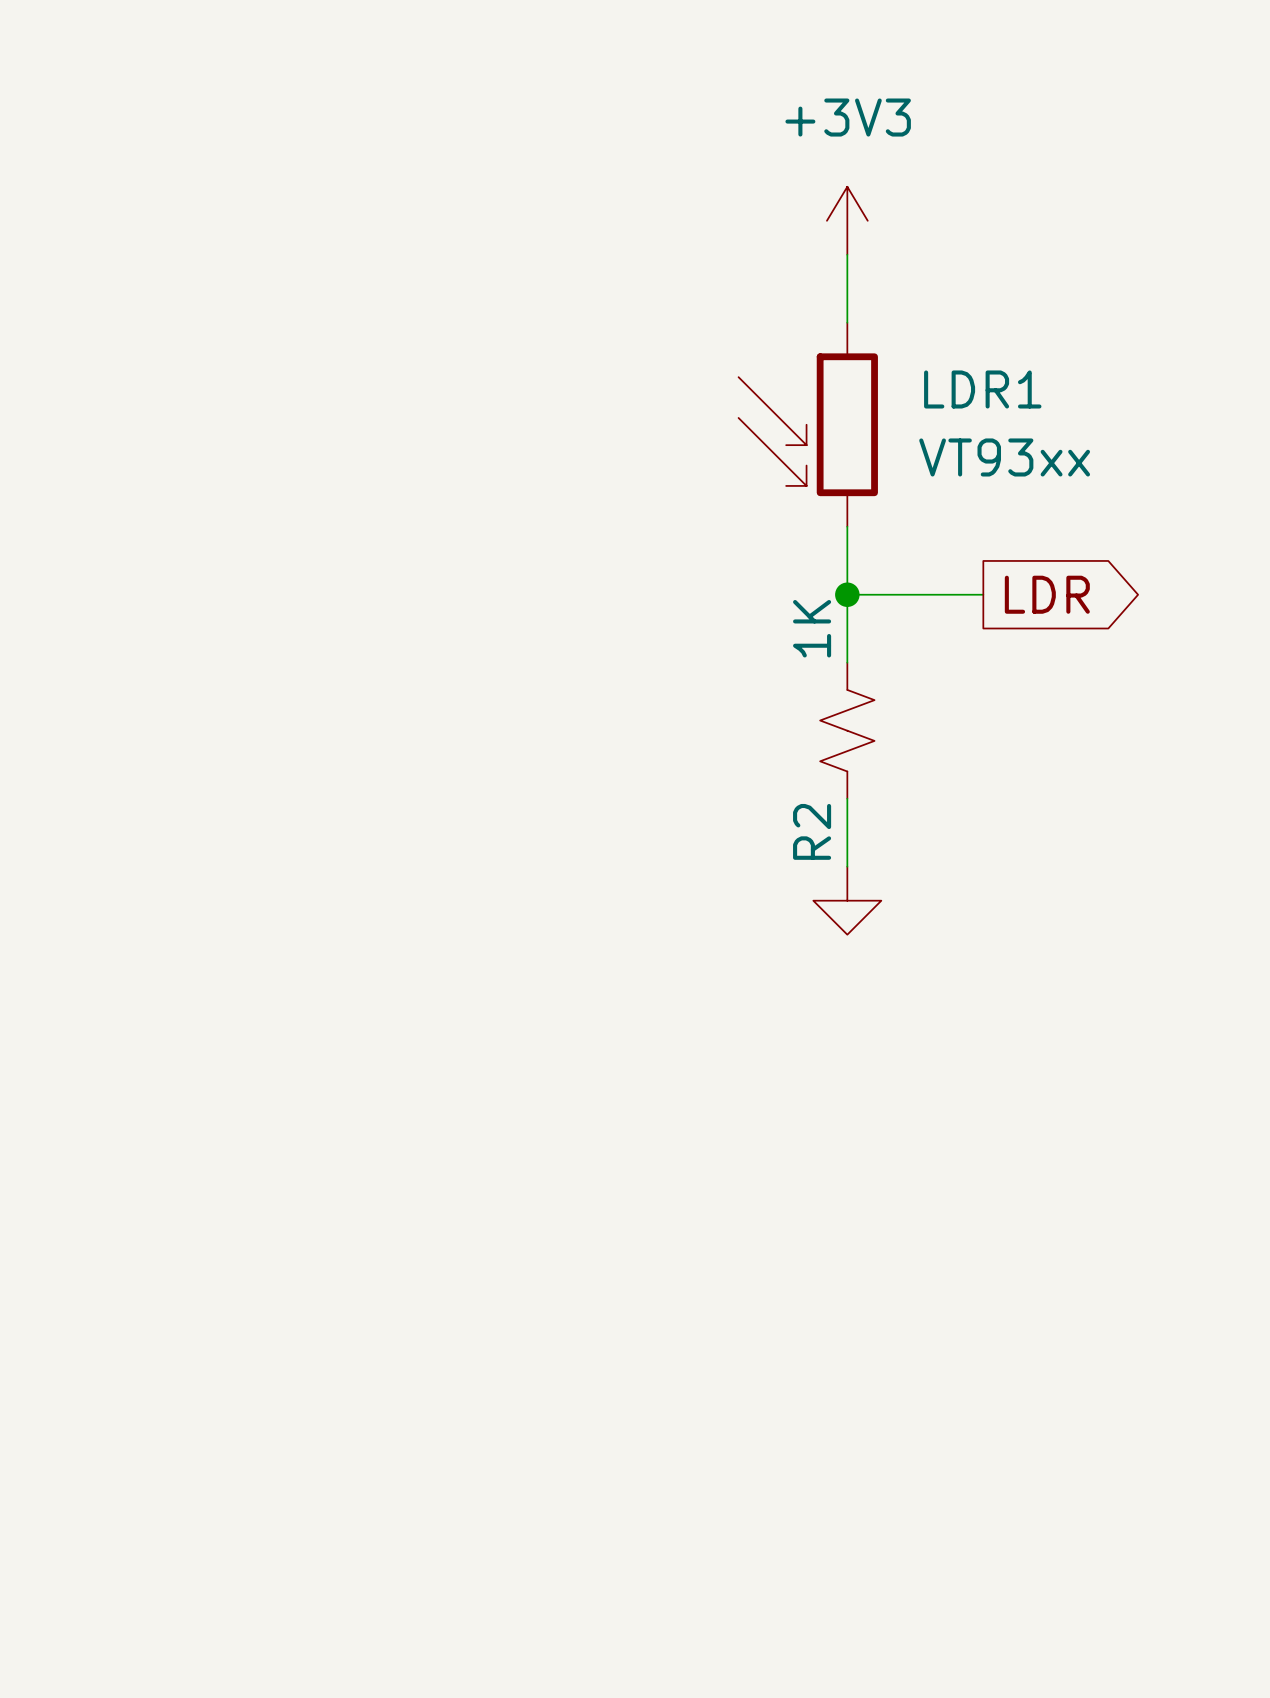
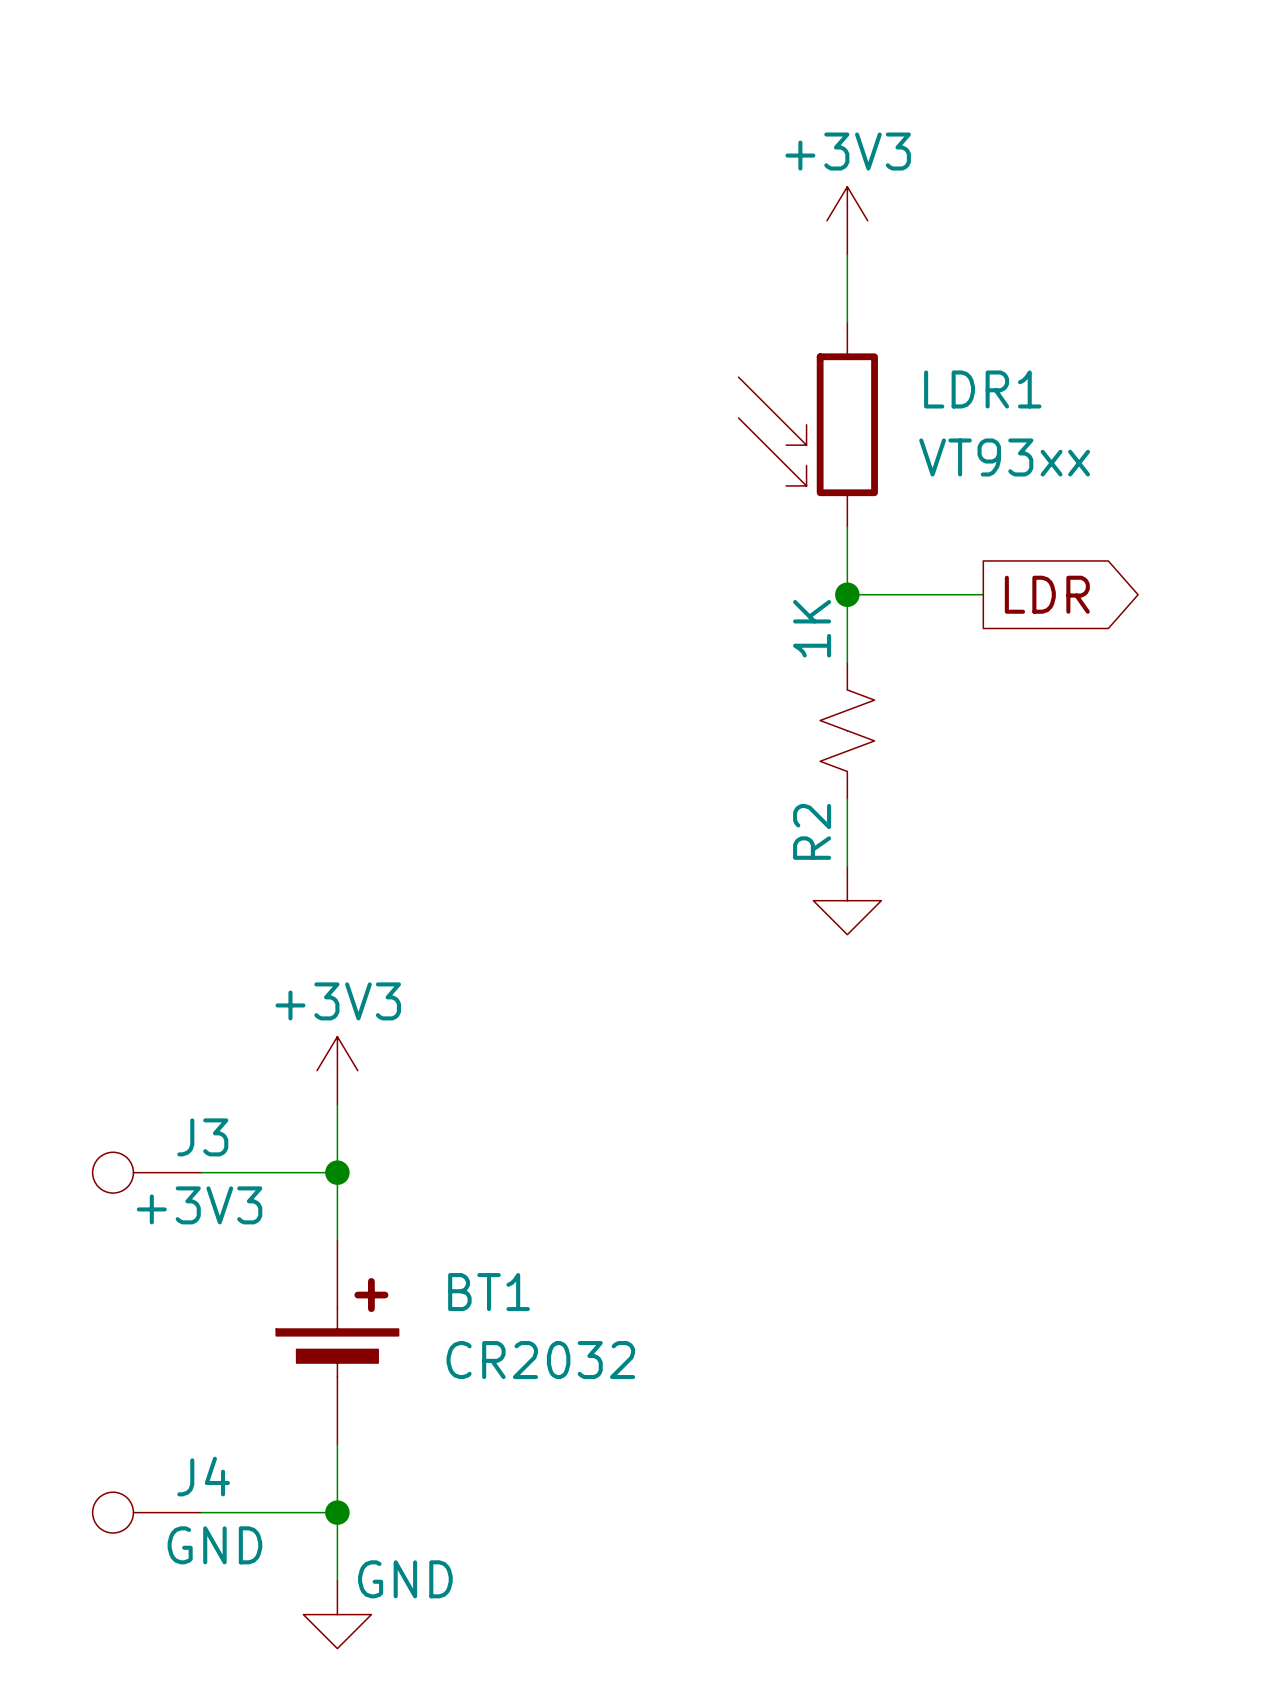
power symbol text position: +3V3 (848, 117) -> +3V3 (848, 151)
power symbol: none -> +3V3 (337, 1070)
wire: none -> (337, 1104) (337, 1240)
J3: none -> +3V3 (147, 1172)
wire: none -> (201, 1172) (337, 1172)
junction: none -> (337, 1172)
BT1: none -> CR2032 (337, 1342)
wire: none -> (337, 1444) (337, 1580)
J4: none -> GND (147, 1512)
wire: none -> (201, 1512) (337, 1512)
junction: none -> (337, 1512)
power symbol: none -> GND (337, 1614)

